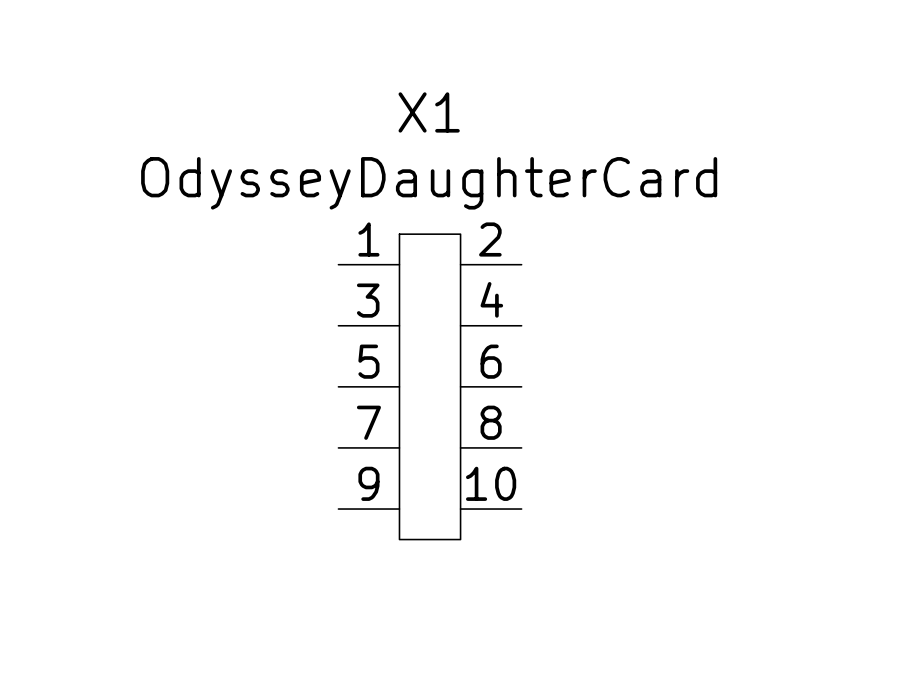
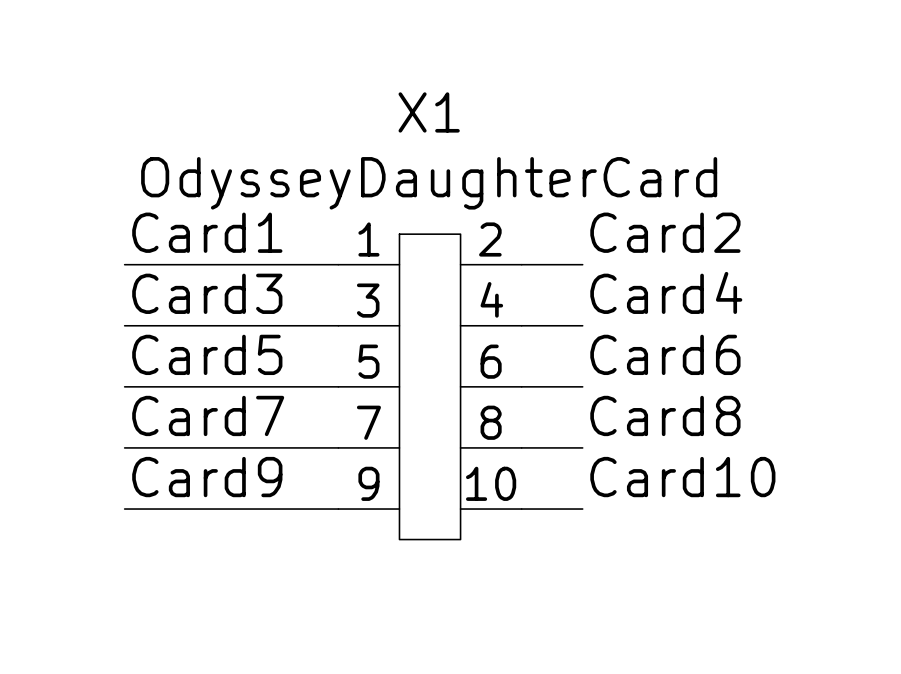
label: none -> Card1 (207, 232)
label: none -> Card2 (665, 232)
wire: none -> (124, 264) (338, 264)
wire: none -> (521, 264) (582, 264)
label: none -> Card4 (666, 292)
label: none -> Card3 (207, 293)
wire: none -> (124, 325) (338, 325)
wire: none -> (521, 325) (582, 325)
label: none -> Card5 (207, 354)
label: none -> Card6 (665, 354)
wire: none -> (124, 386) (338, 386)
wire: none -> (521, 386) (582, 386)
label: none -> Card7 (208, 415)
label: none -> Card8 (665, 415)
wire: none -> (124, 447) (338, 447)
wire: none -> (521, 447) (582, 447)
label: none -> Card9 (207, 477)
label: none -> Card10 (682, 477)
wire: none -> (124, 509) (338, 509)
wire: none -> (521, 509) (582, 509)

